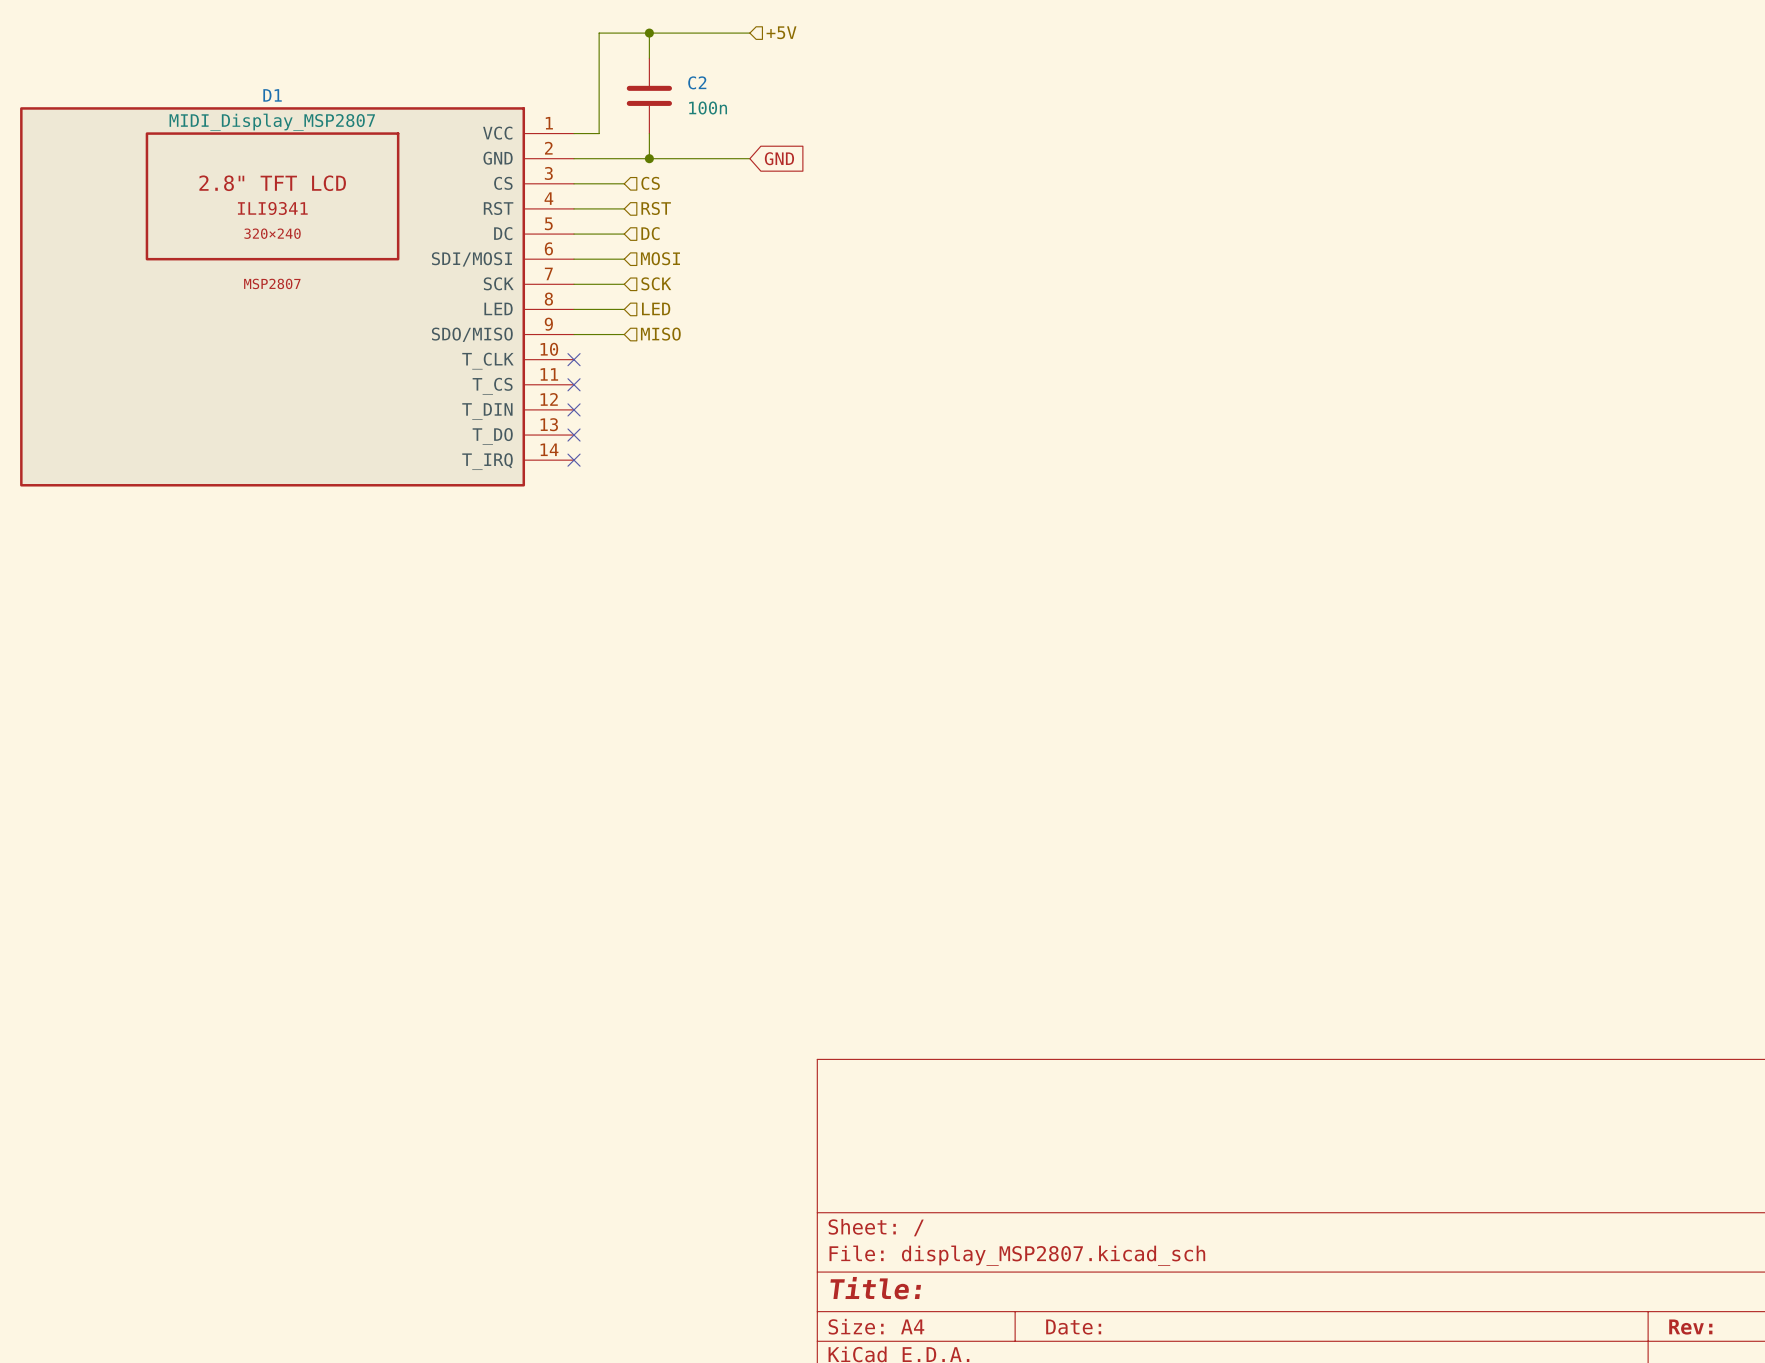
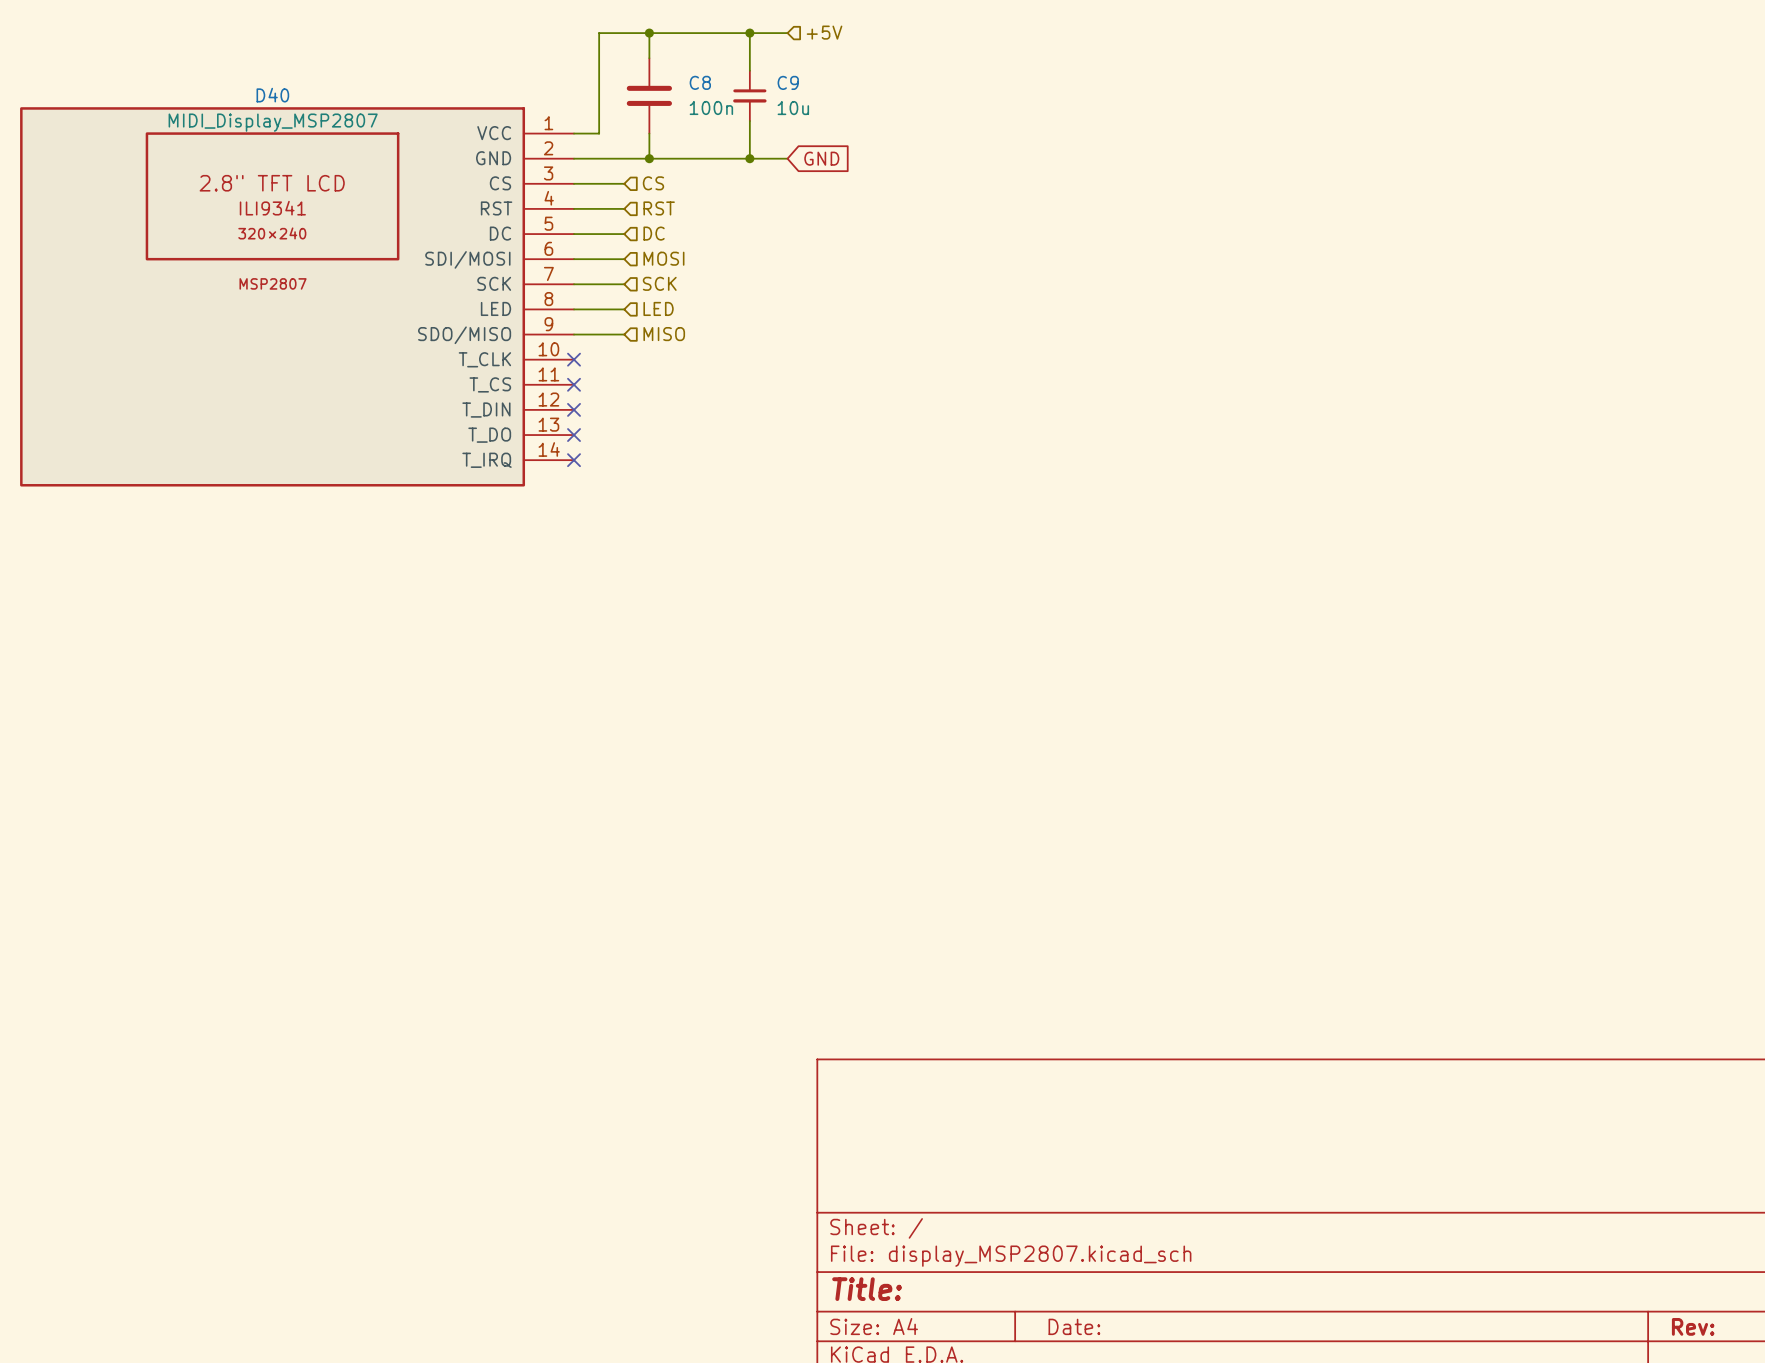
hierarchical label position: +5V (781, 32) -> +5V (824, 32)
junction: none -> (749, 33)
wire: none -> (787, 33) (749, 33) (749, 70)
C2 name: C2 (697, 82) -> C8 (700, 82)
D1 name: D1 (272, 95) -> D40 (272, 95)
C9: none -> (749, 95)
wire: none -> (749, 121) (749, 158) (787, 158)
junction: none -> (749, 158)
global label position: GND (779, 158) -> GND (821, 158)

